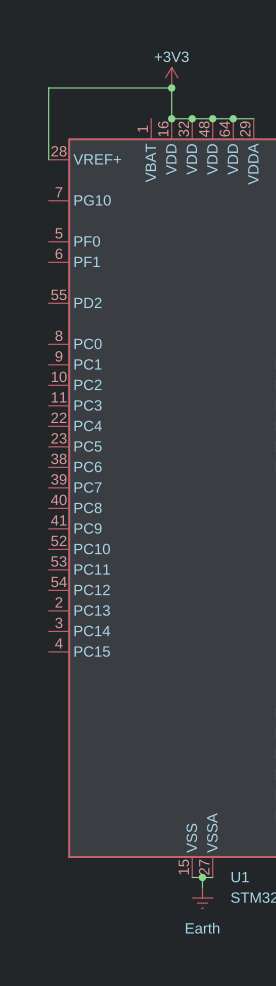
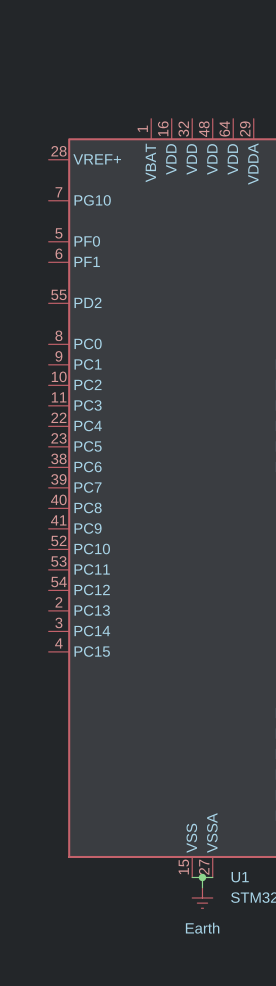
power symbol: +3V3 (171, 77) -> none
junction: (171, 87) -> none
junction: (171, 118) -> none
junction: (192, 118) -> none
junction: (212, 118) -> none
junction: (233, 118) -> none
wire: (253, 118) (171, 118) (171, 87) (48, 87) (48, 159) -> none

